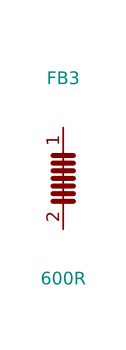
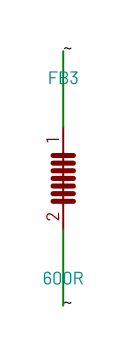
label: none -> ~ (67, 48)
wire: none -> (63, 51) (63, 127)
wire: none -> (63, 229) (63, 305)
label: none -> ~ (67, 302)

